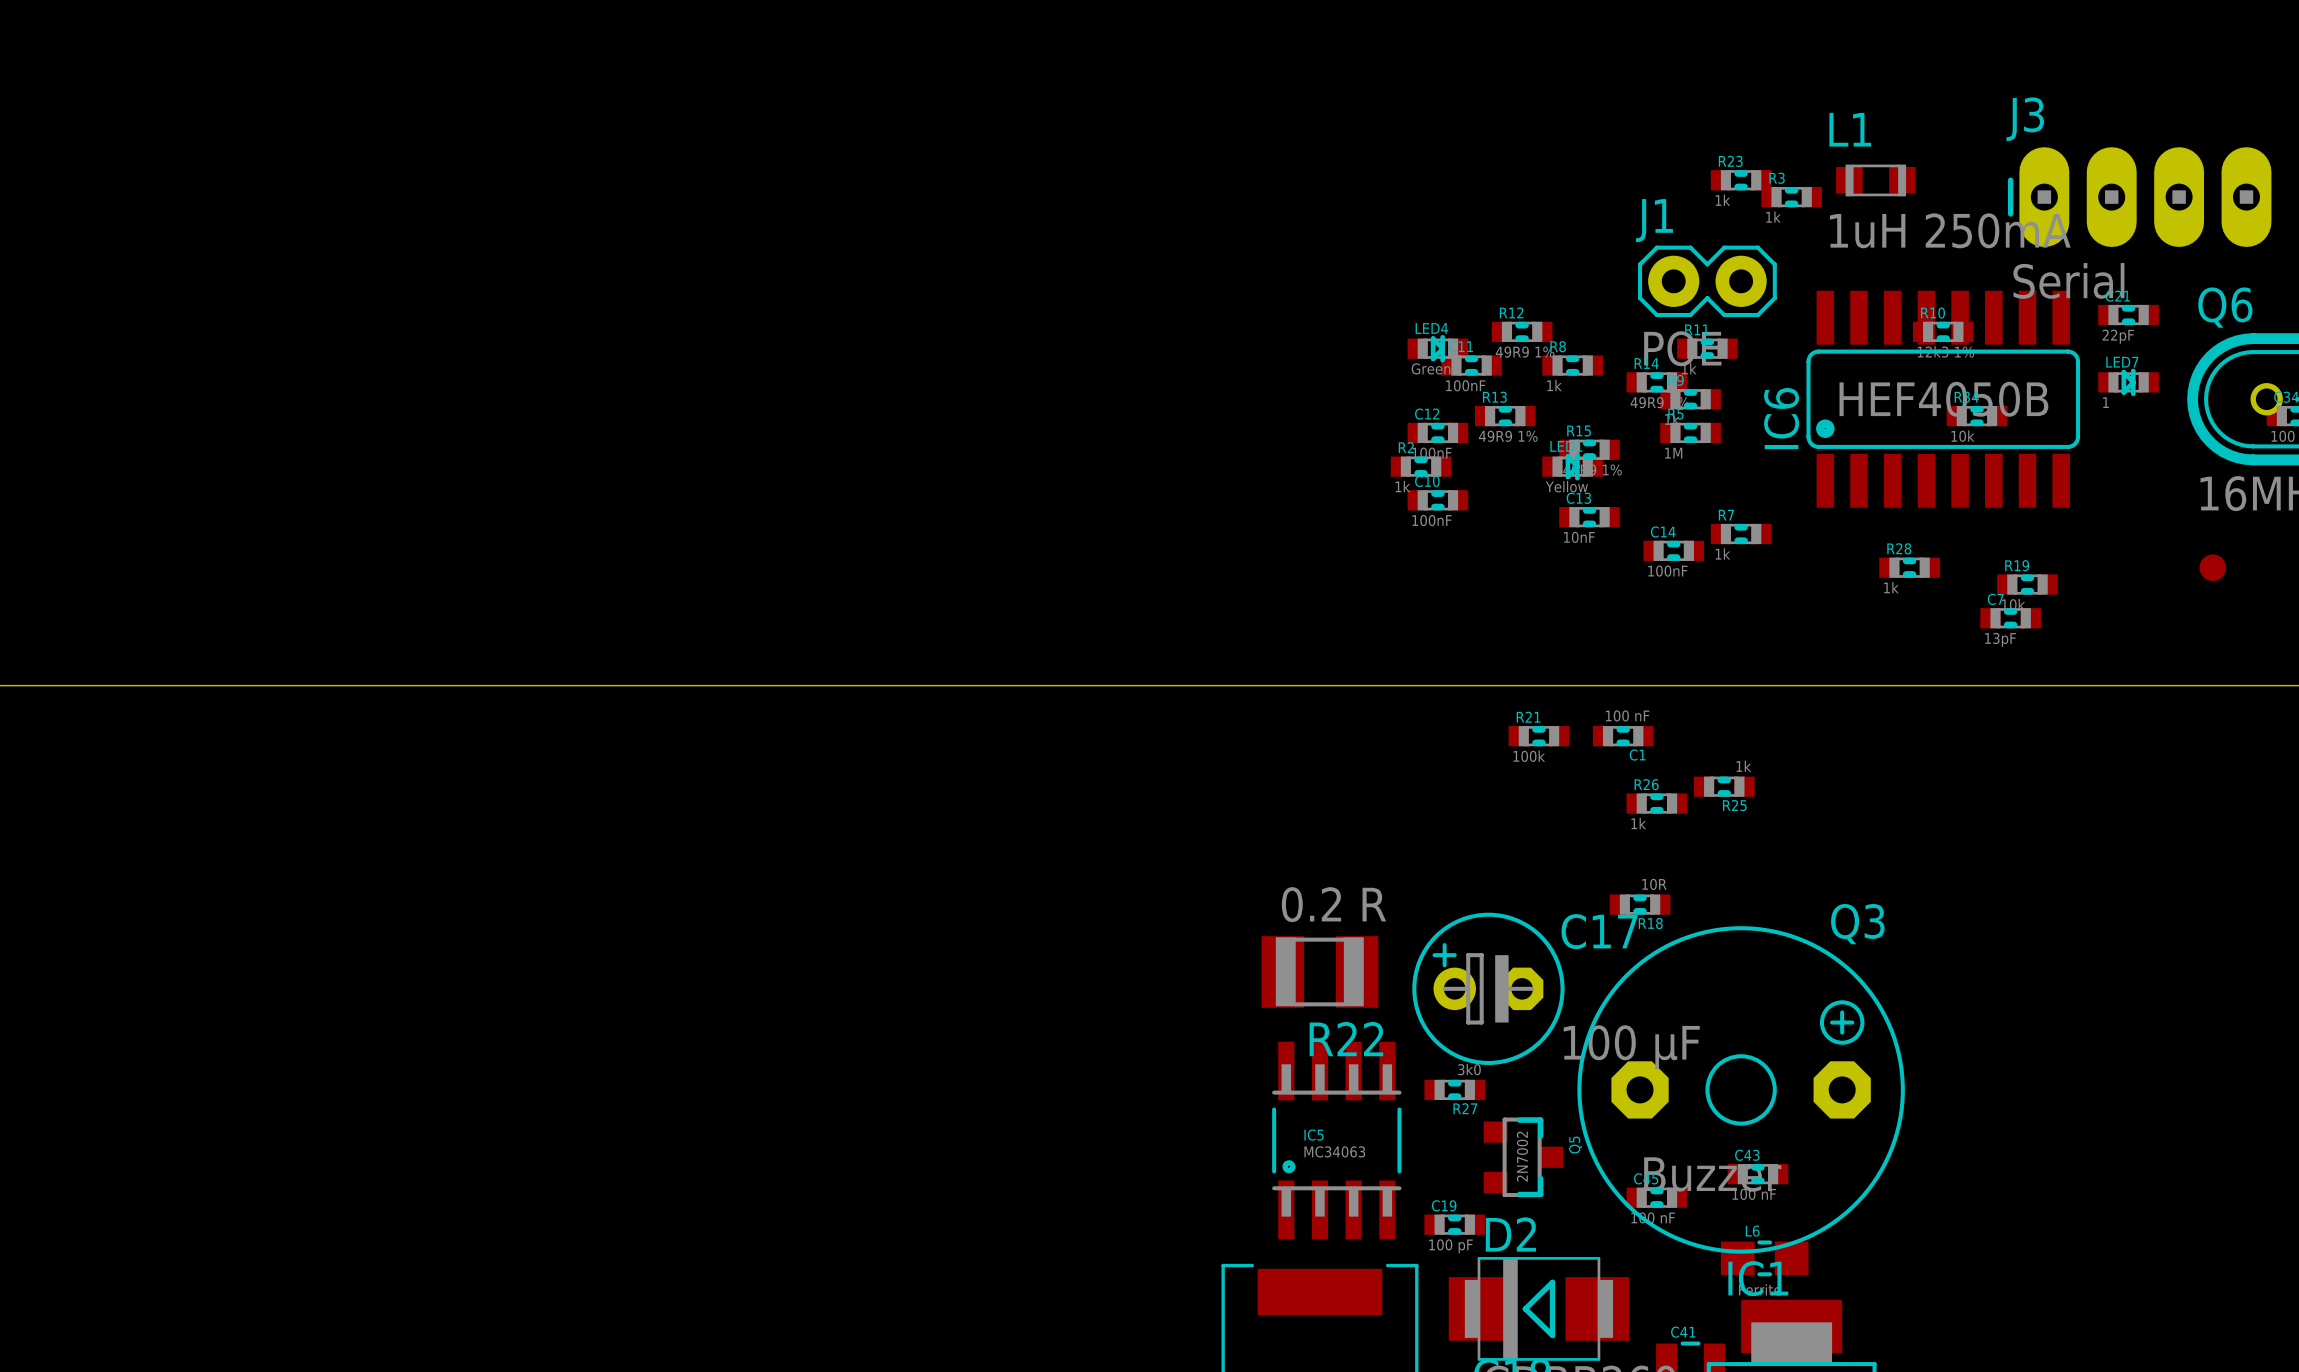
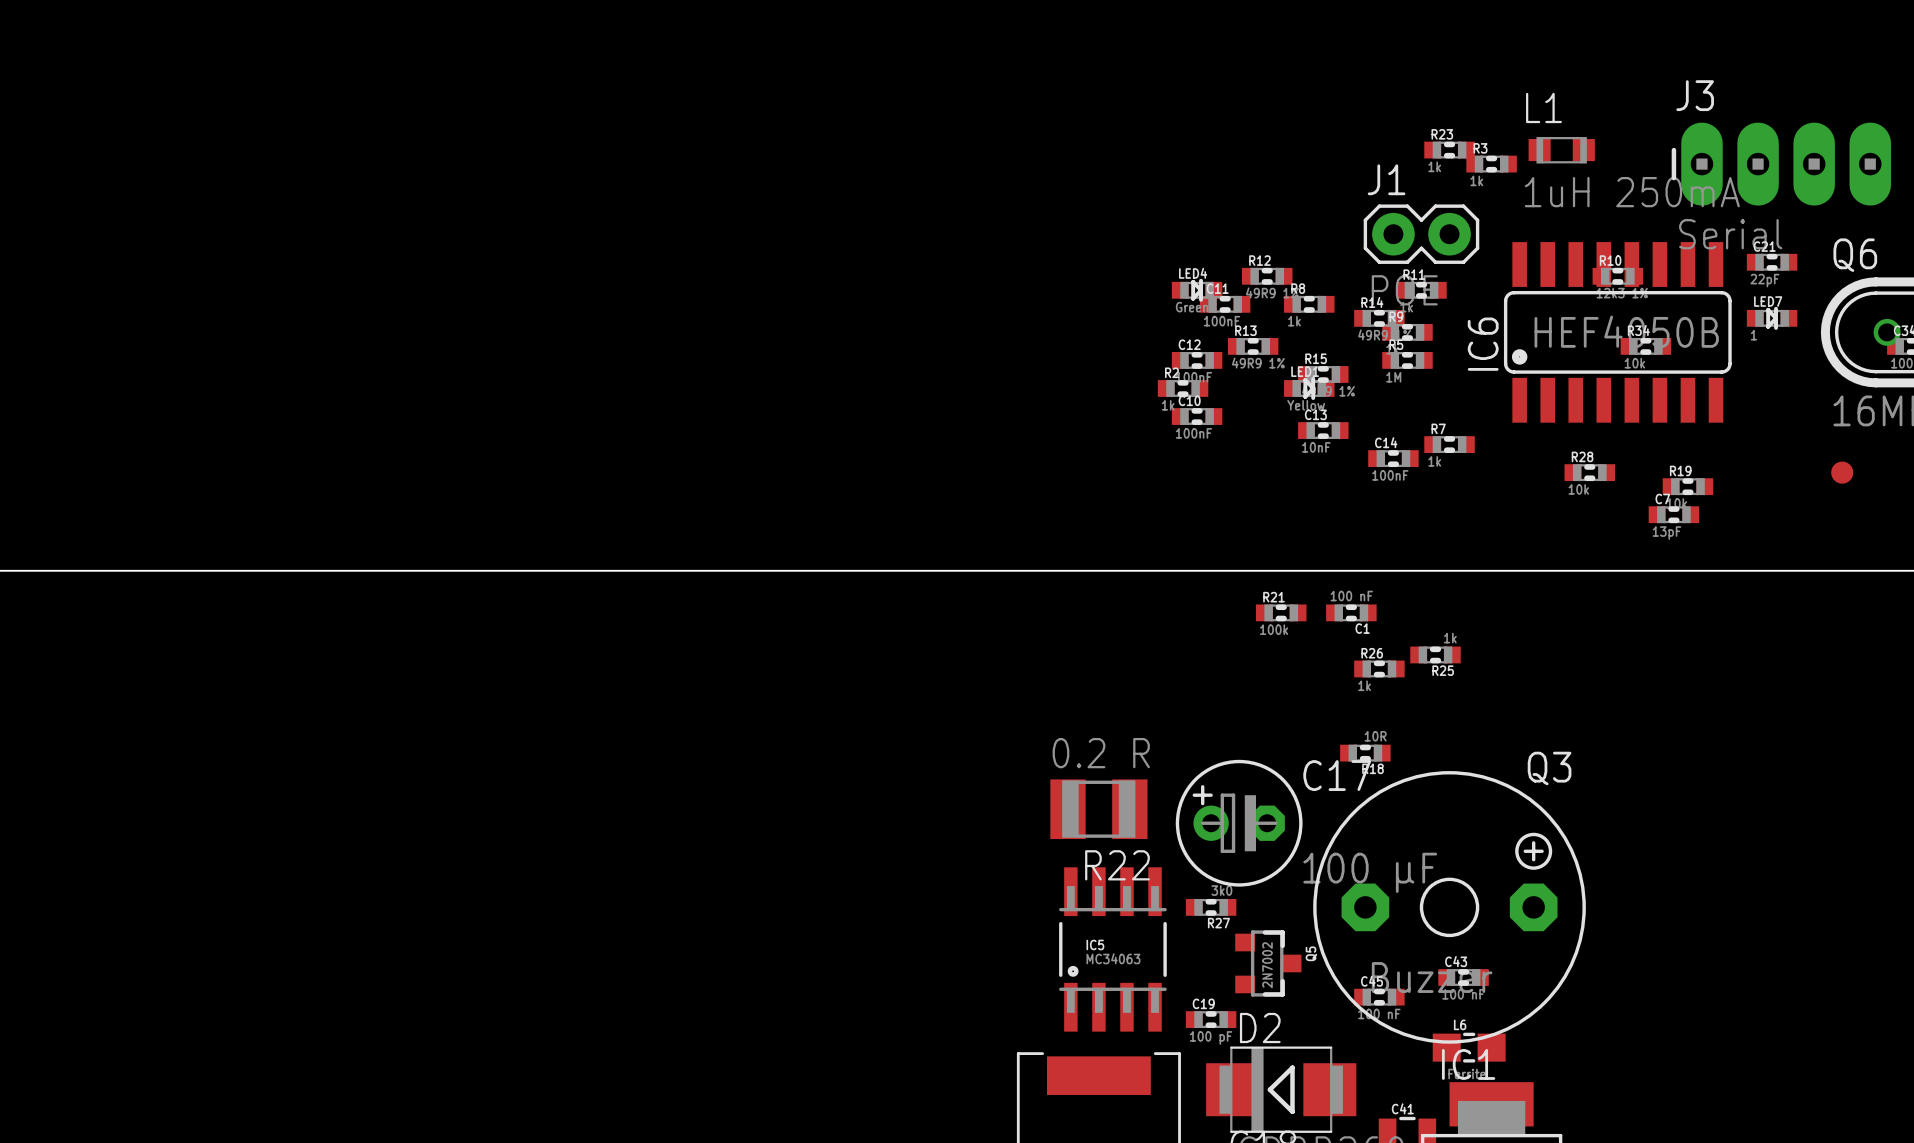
R28 value: 1k (1891, 587) -> 10k (1578, 489)

